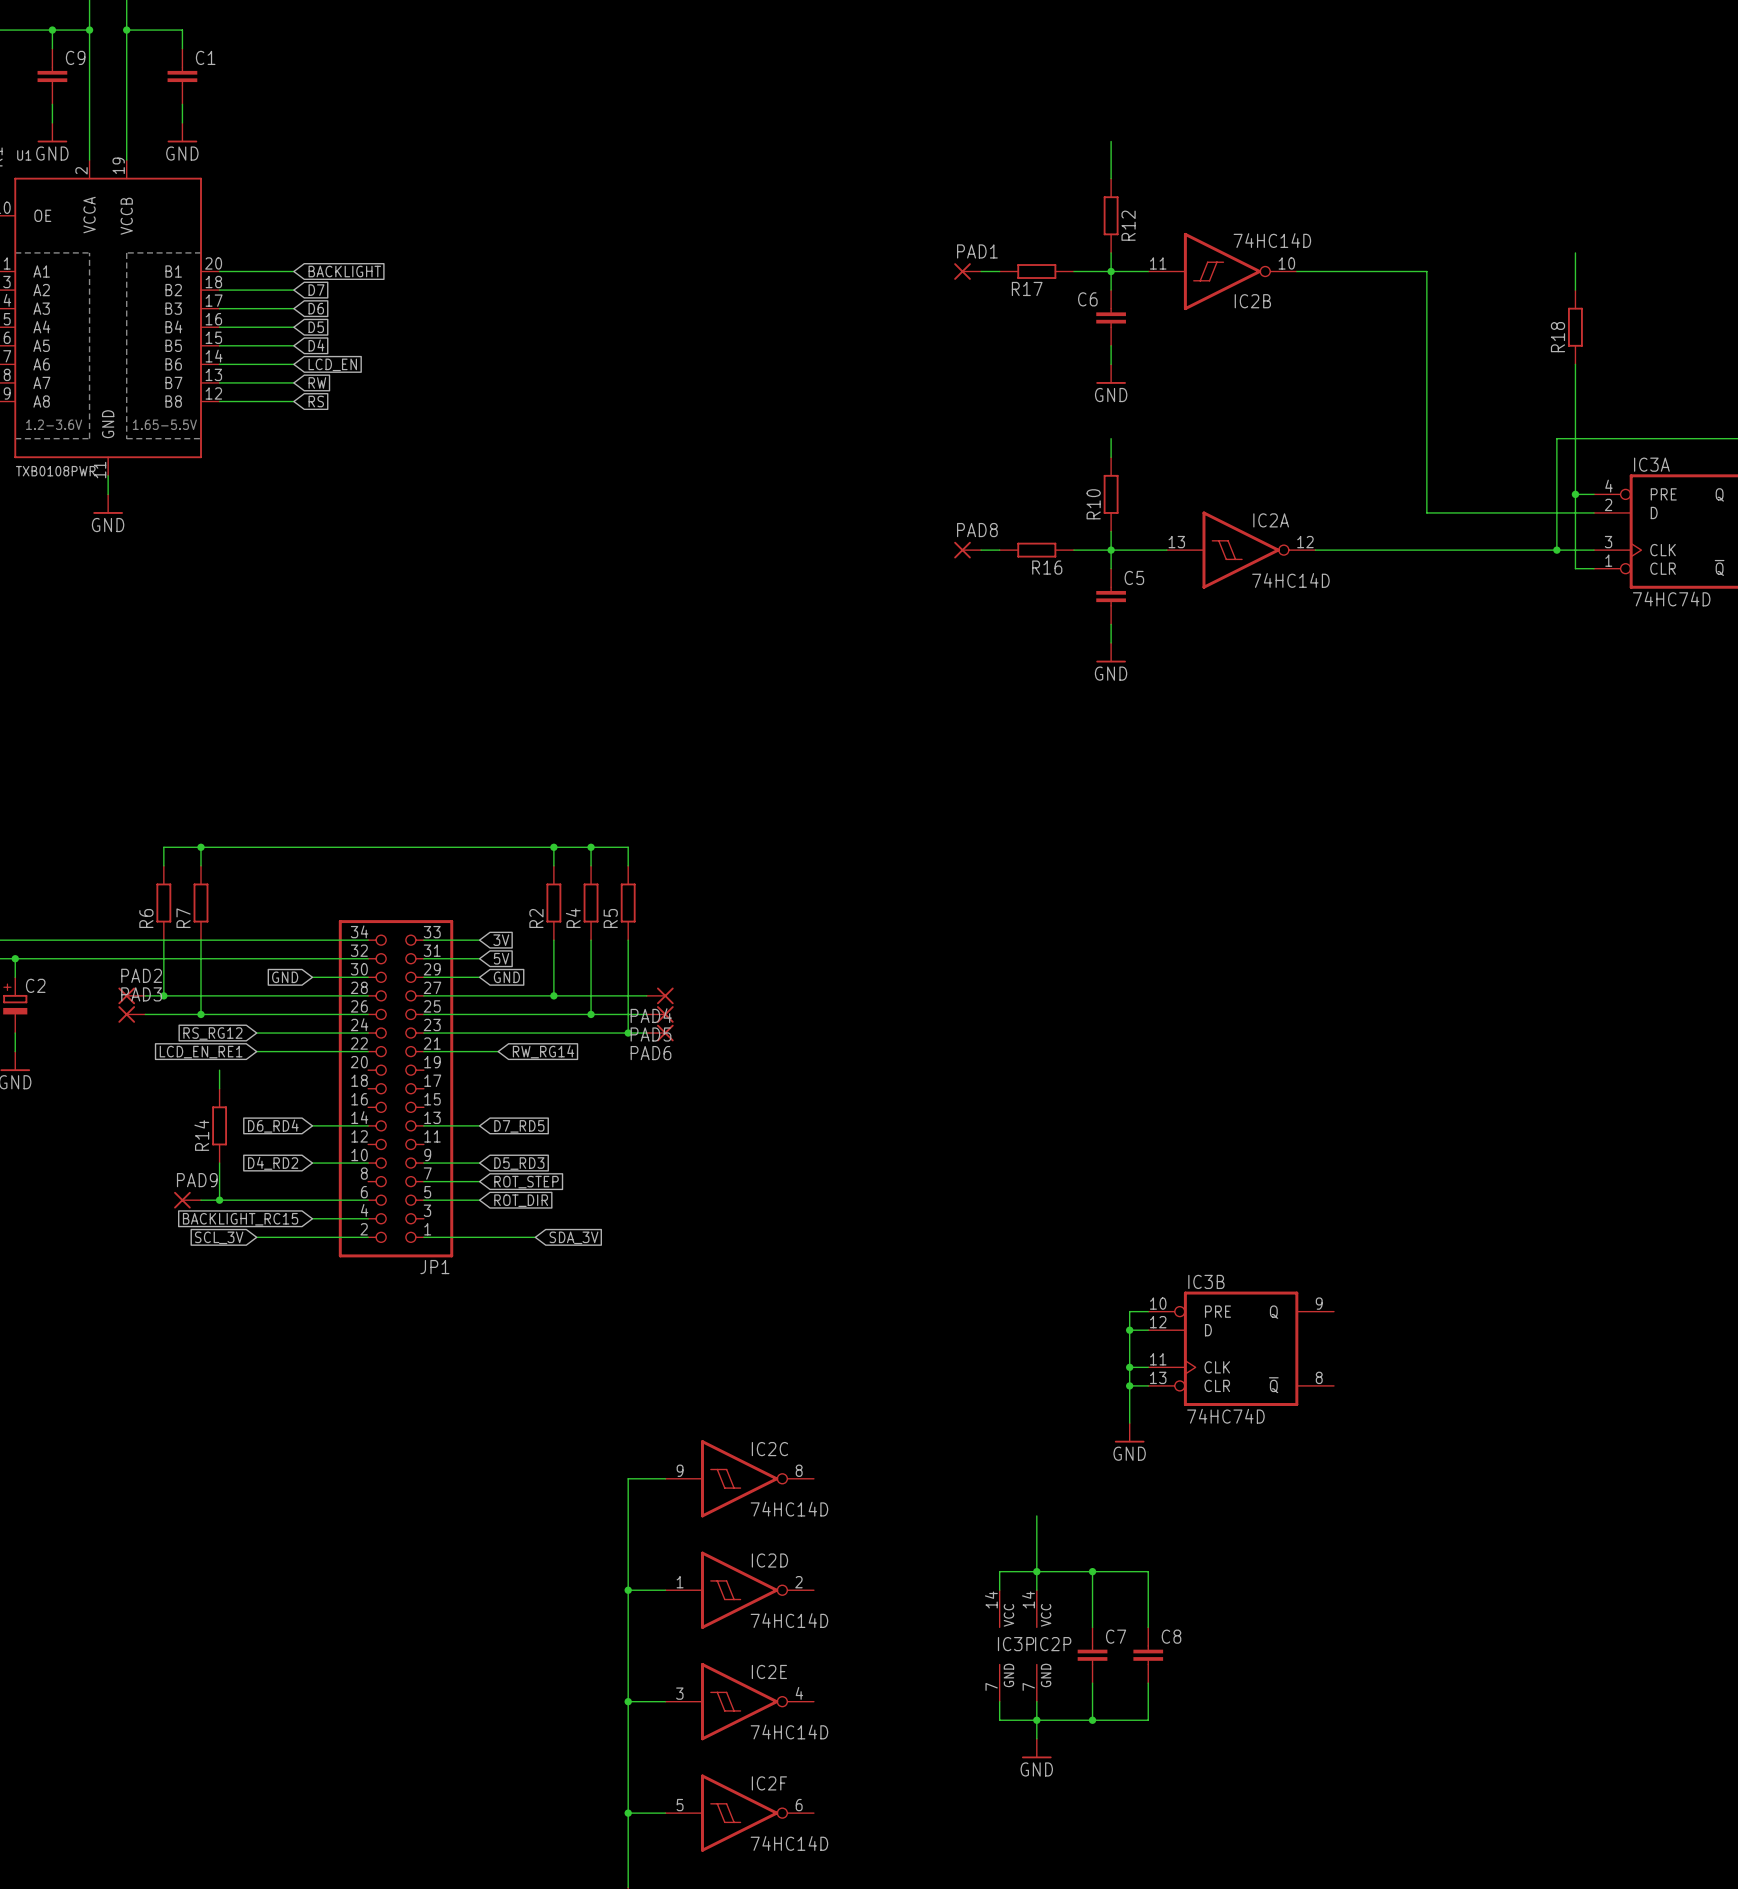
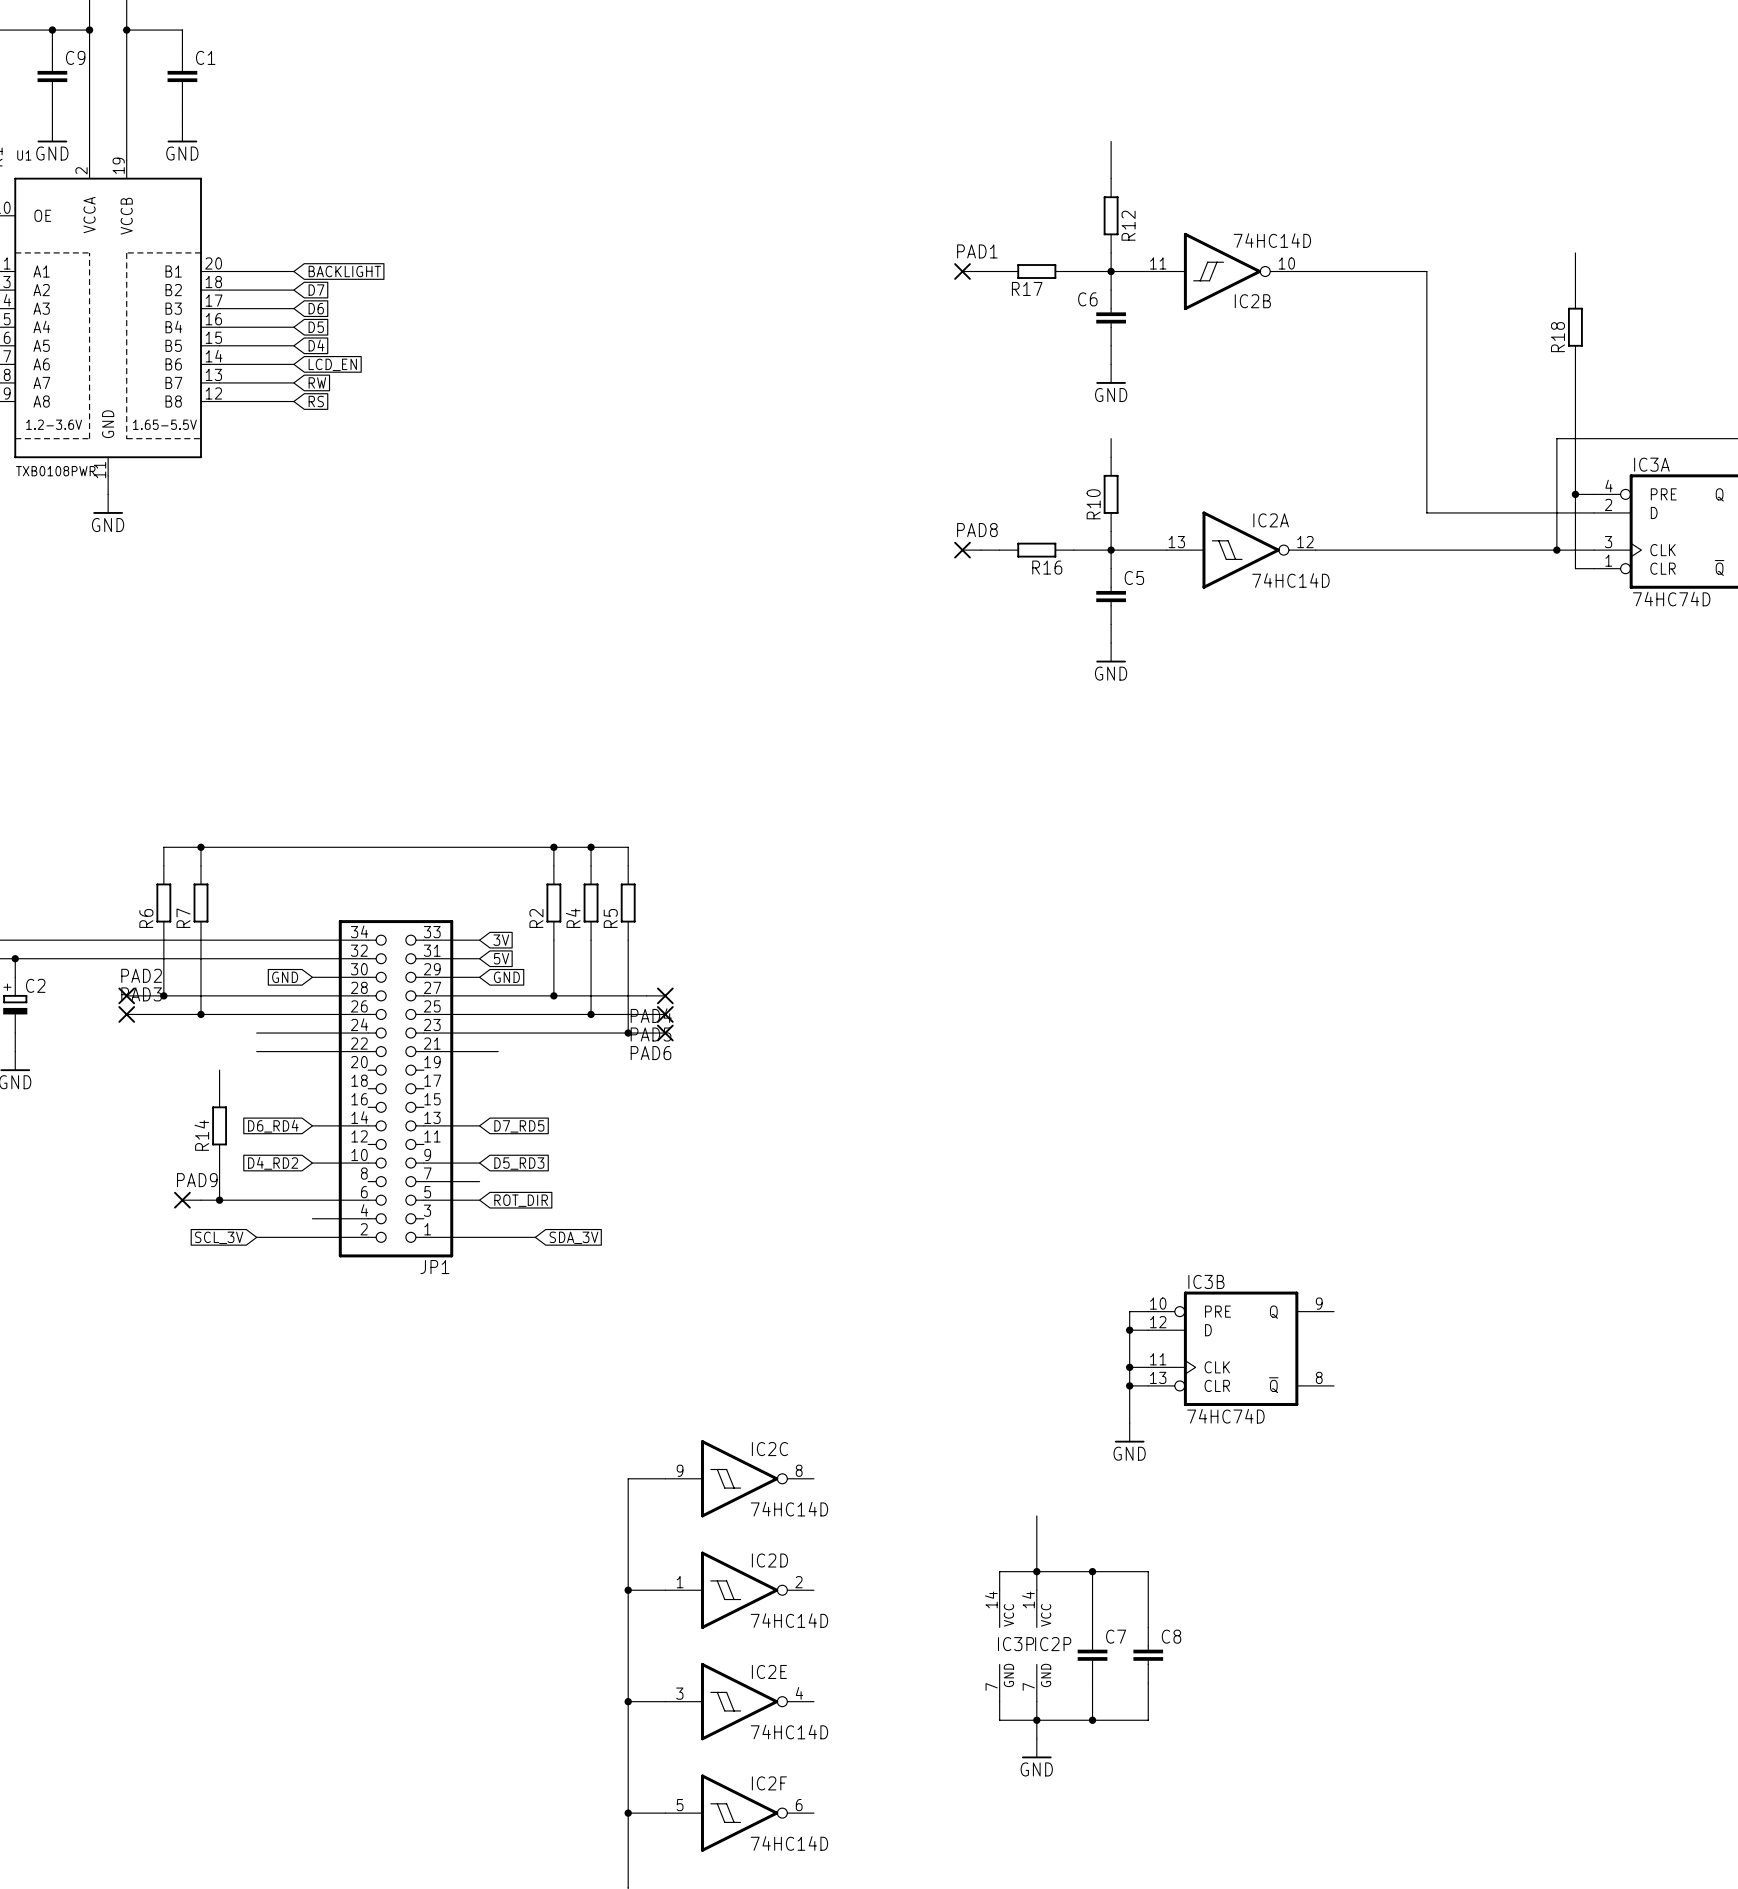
global label: RS_RG12 (212, 1033) -> none
global label: RW_RG14 (543, 1051) -> none
global label: LCD_EN_RE1 (201, 1052) -> none
global label: ROT_STEP (526, 1182) -> none
global label: BACKLIGHT_RC15 (240, 1219) -> none

